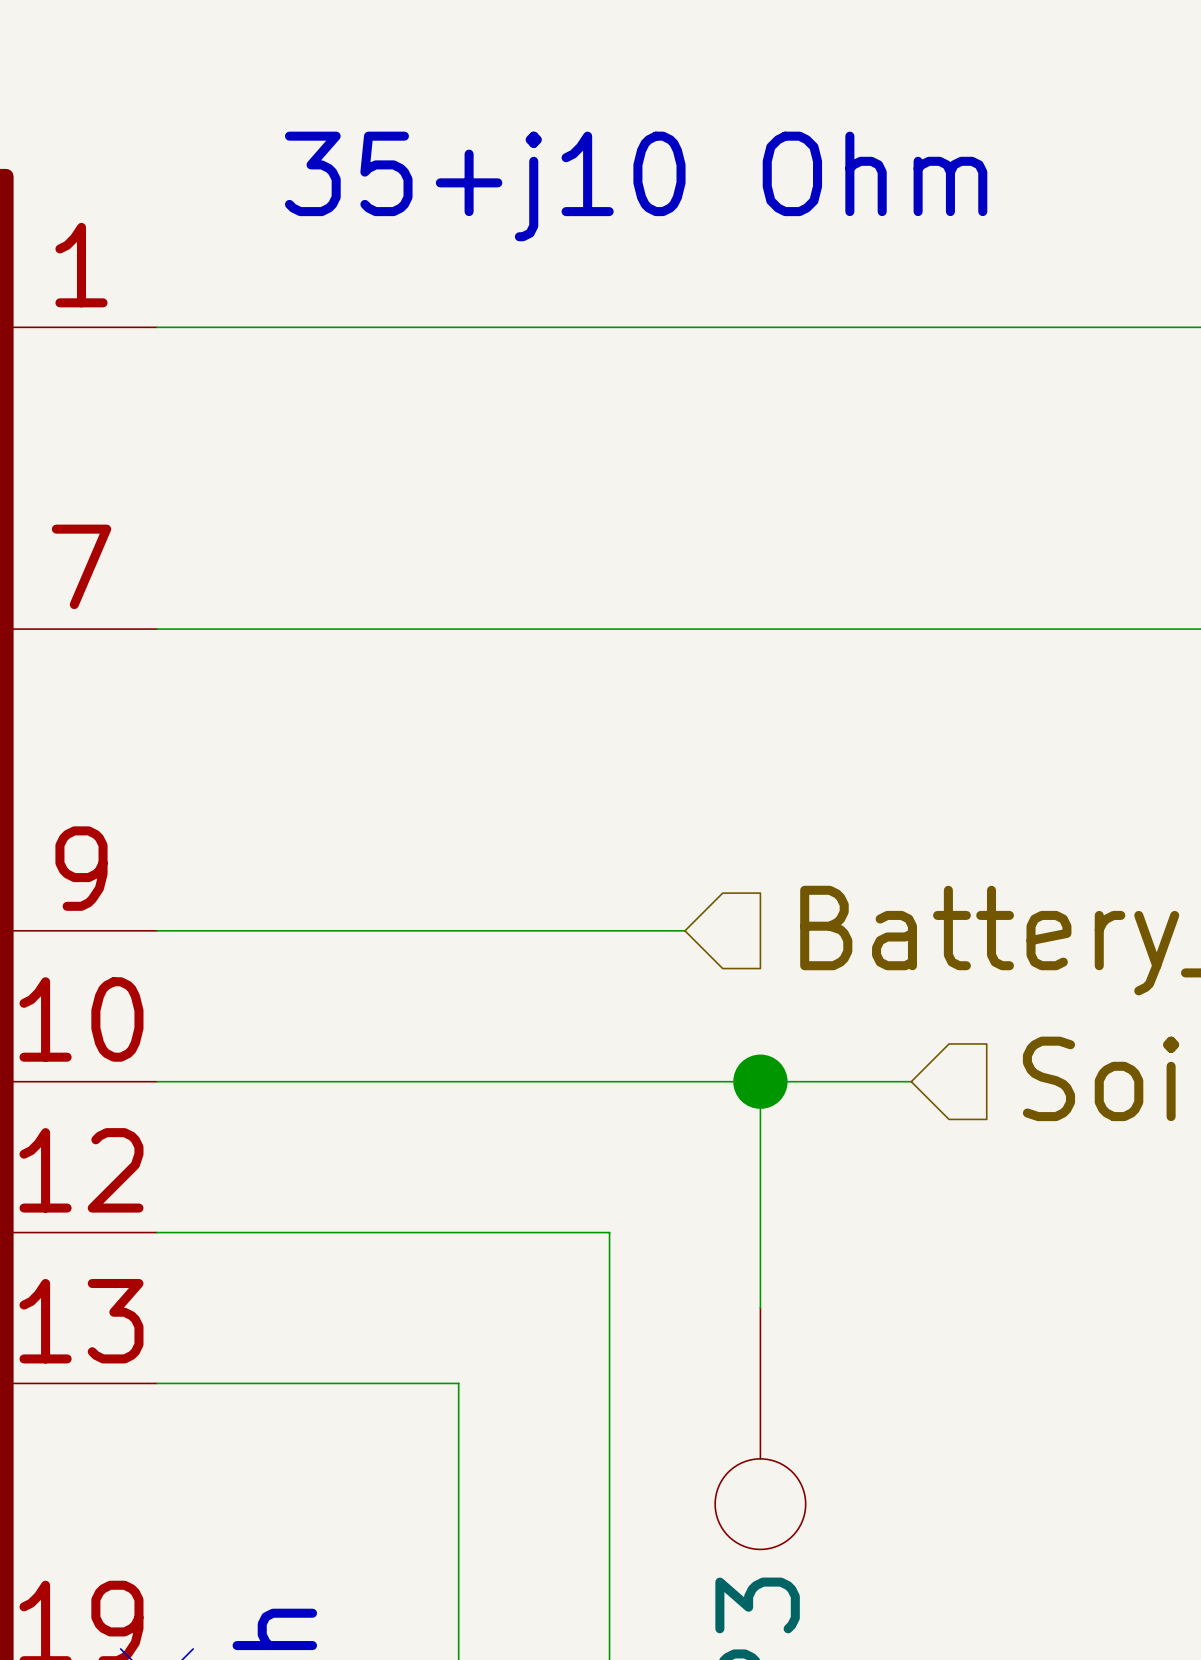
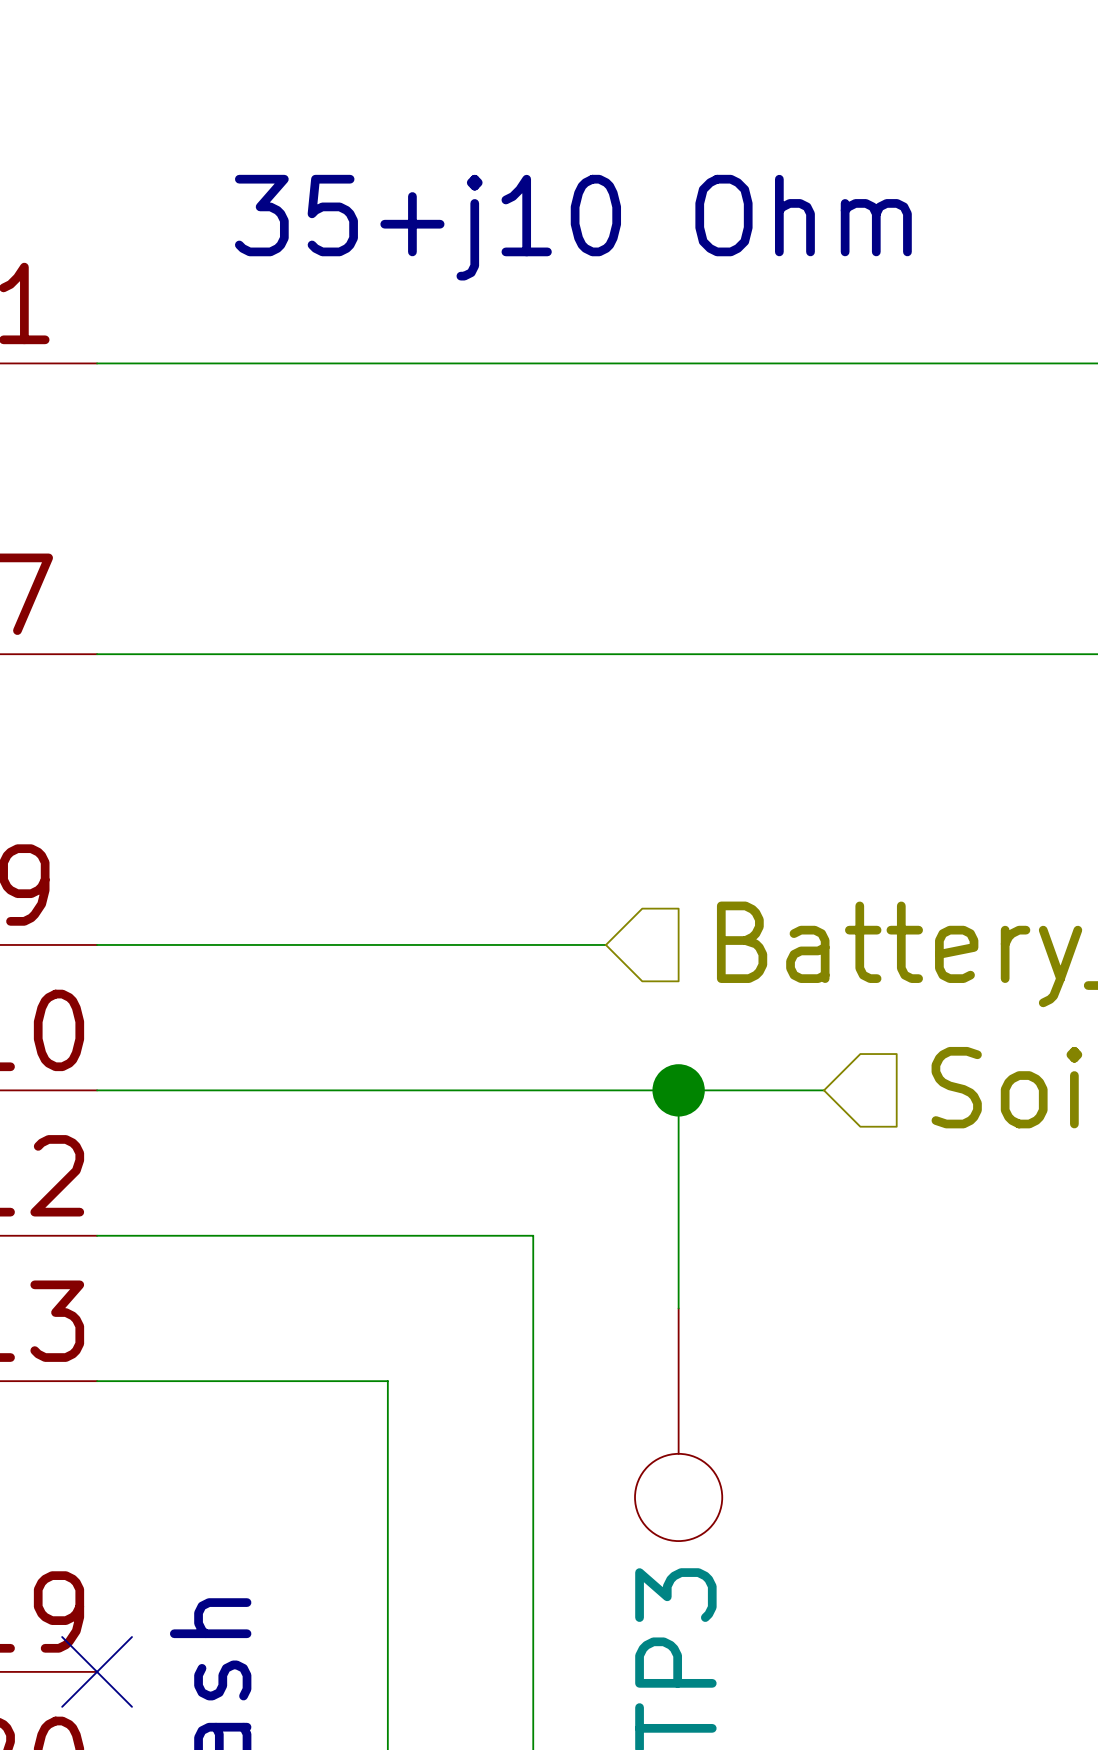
text position: 35+j10 Ohm (636, 186) -> 35+j10 Ohm (573, 227)

